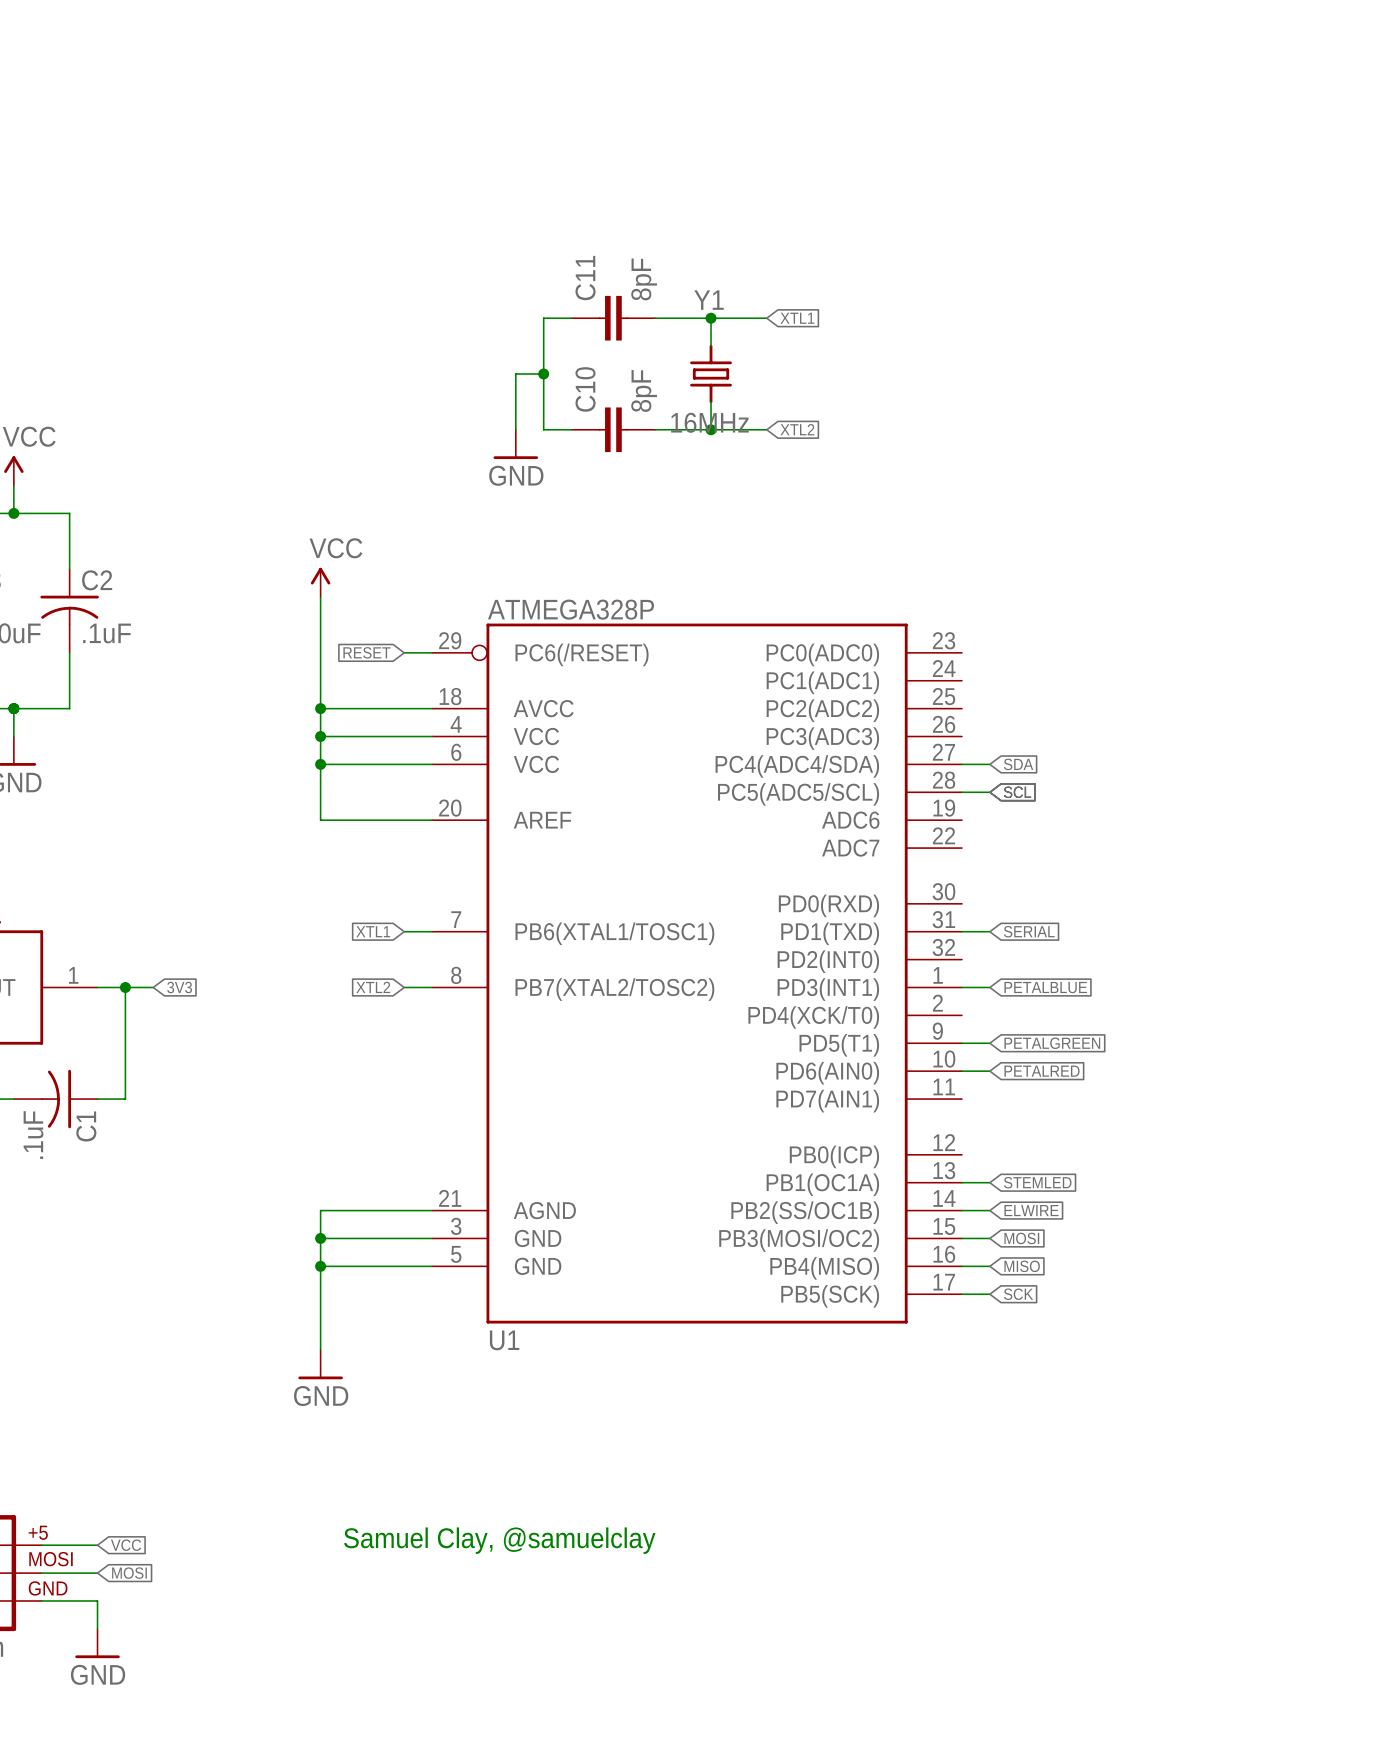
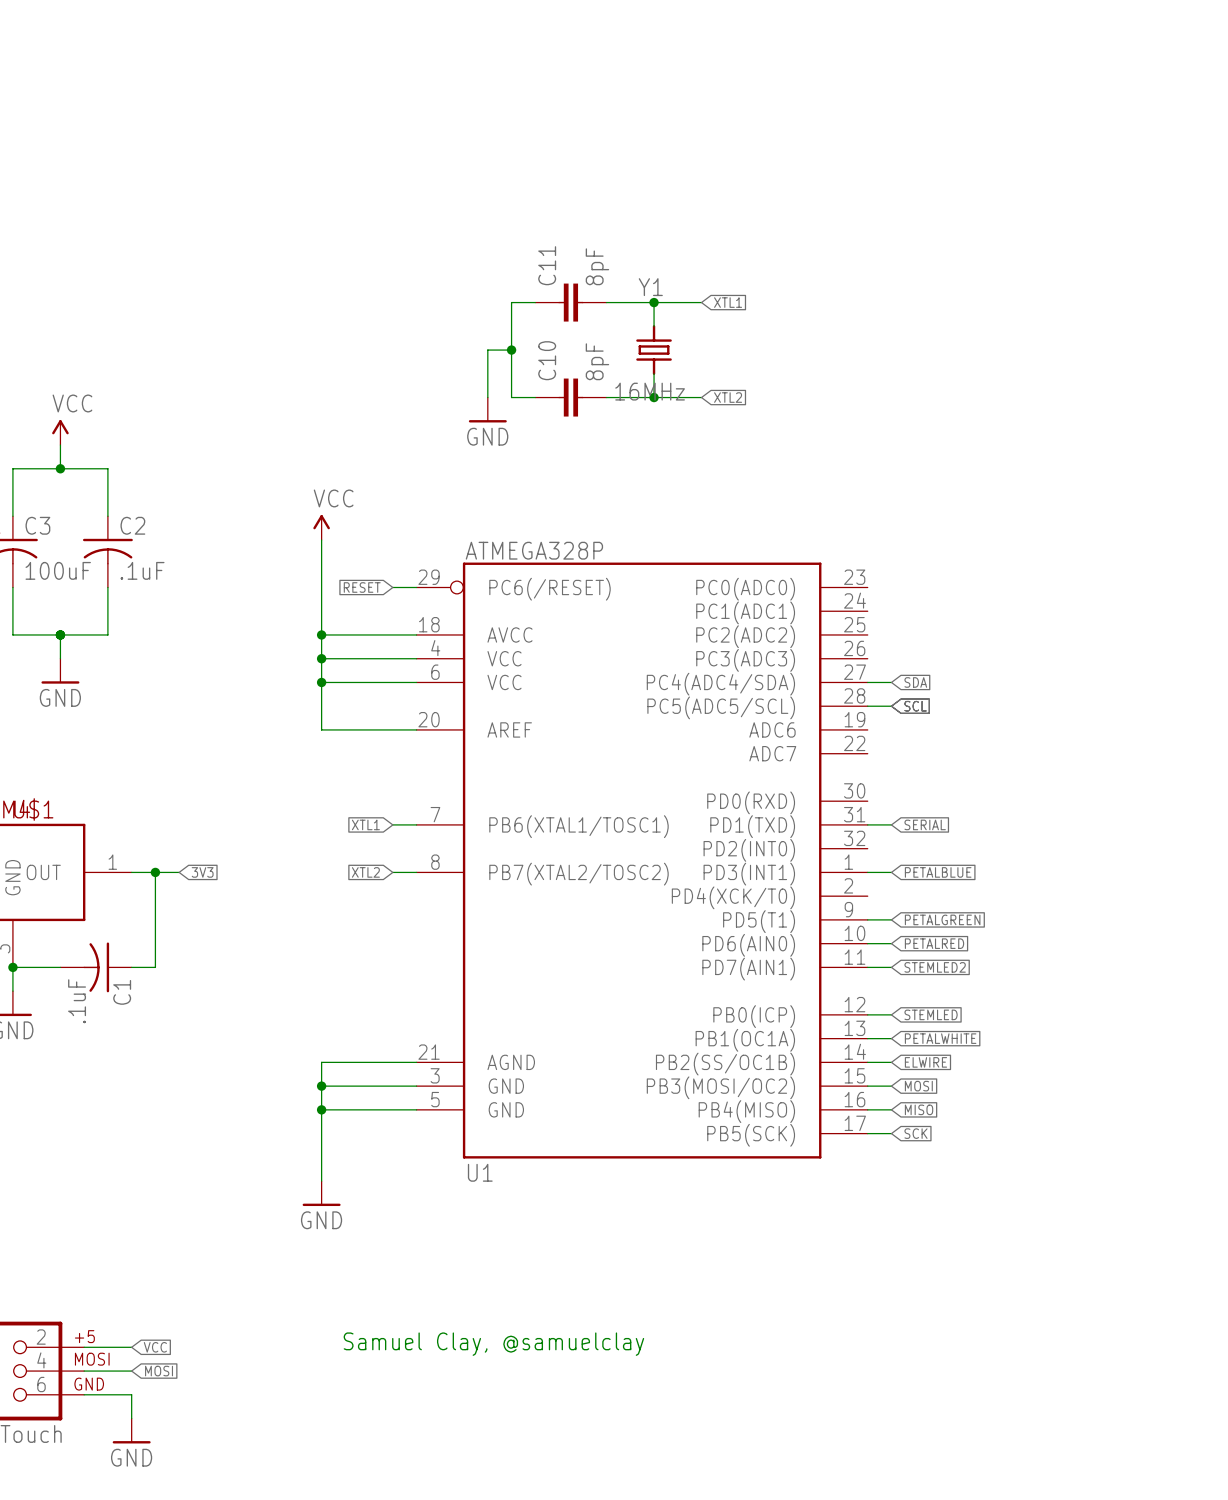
wire: none -> (867, 967) (891, 967)
global label: none -> STEMLED2 (935, 967)
wire: none -> (867, 1014) (891, 1014)
global label: none -> STEMLED (931, 1014)
global label: STEMLED (1037, 1182) -> PETALWHITE (940, 1038)

